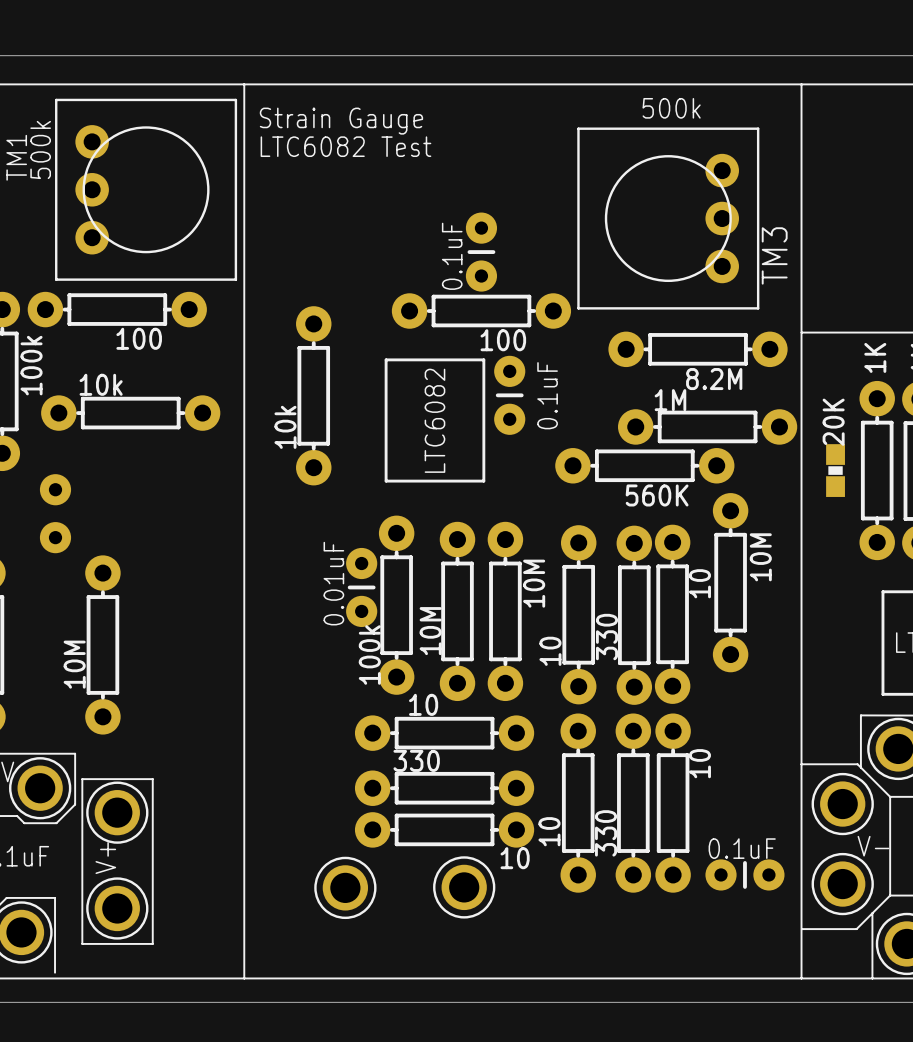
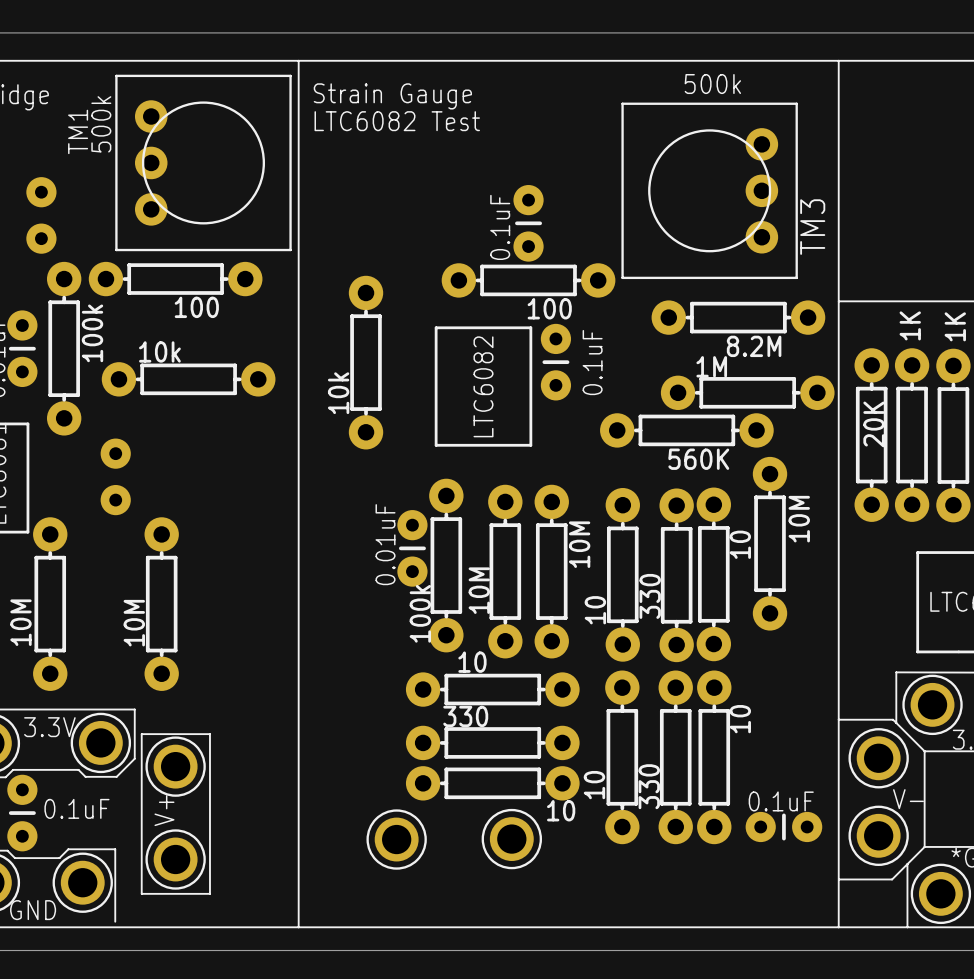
part footprint: [826, 444, 845, 497] -> [854, 348, 889, 522]

